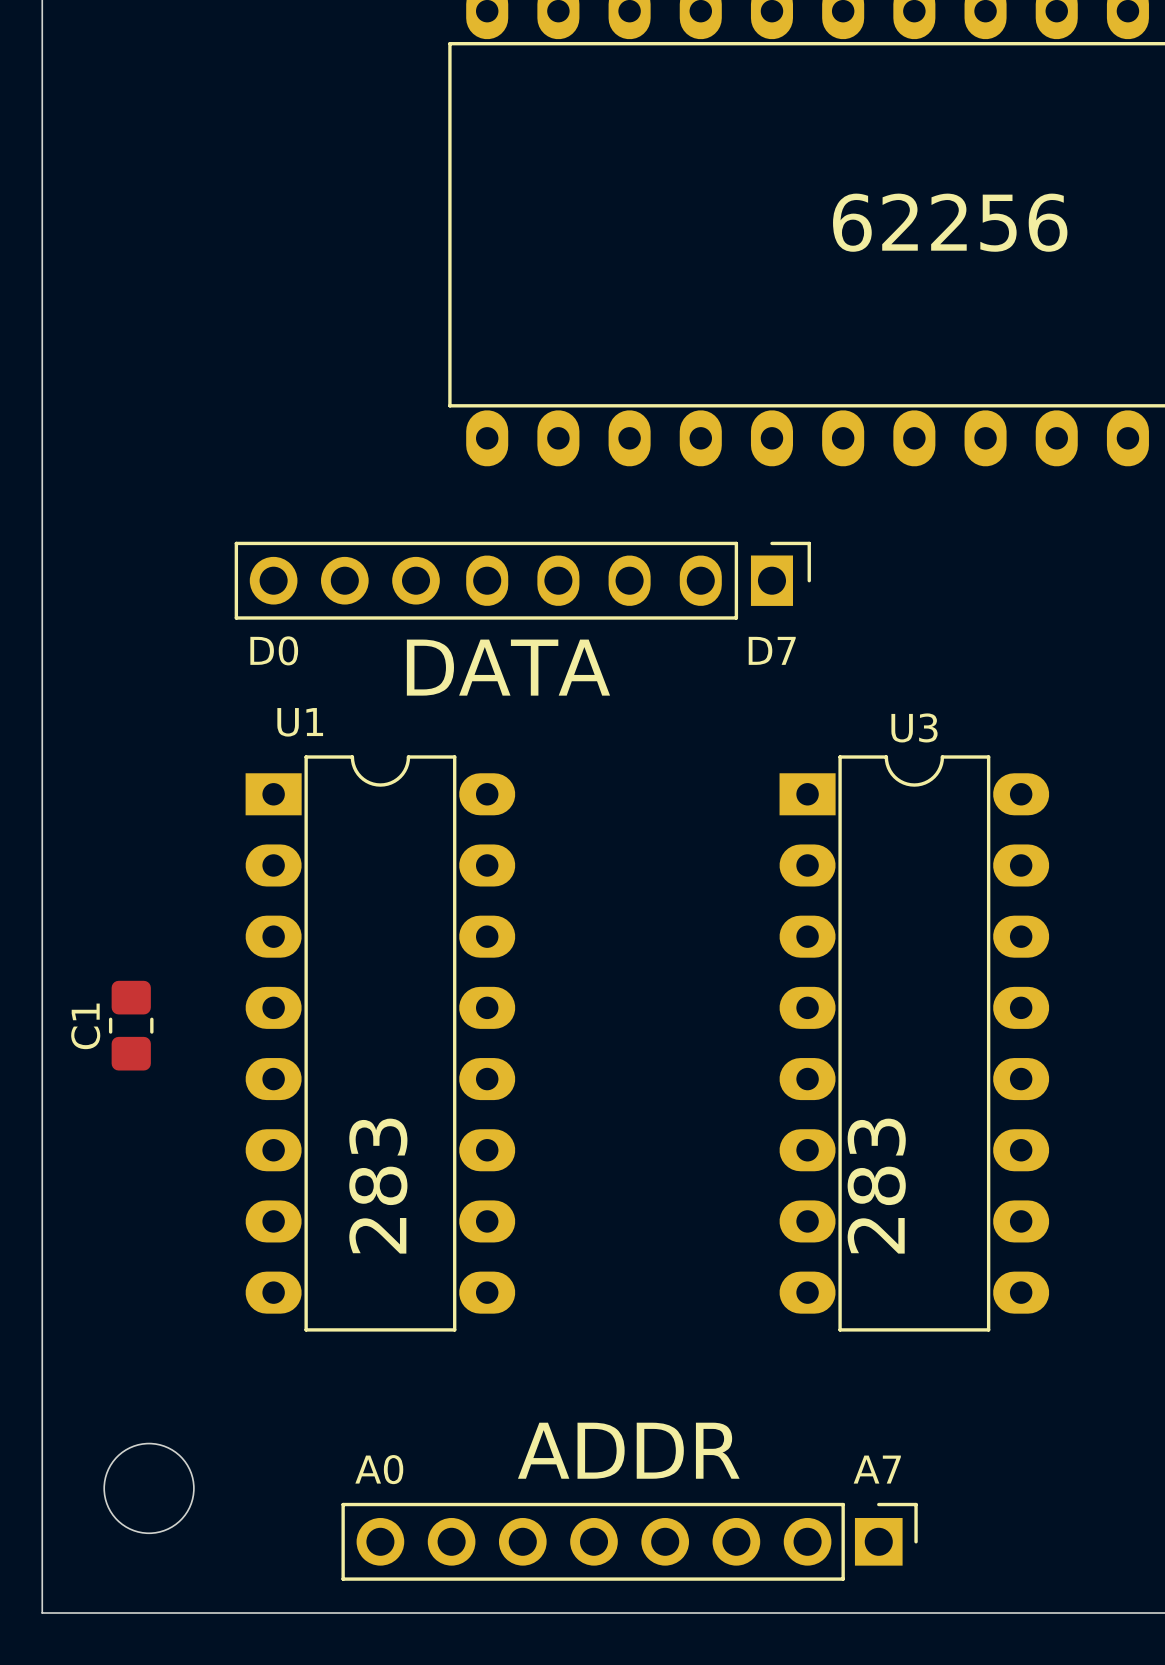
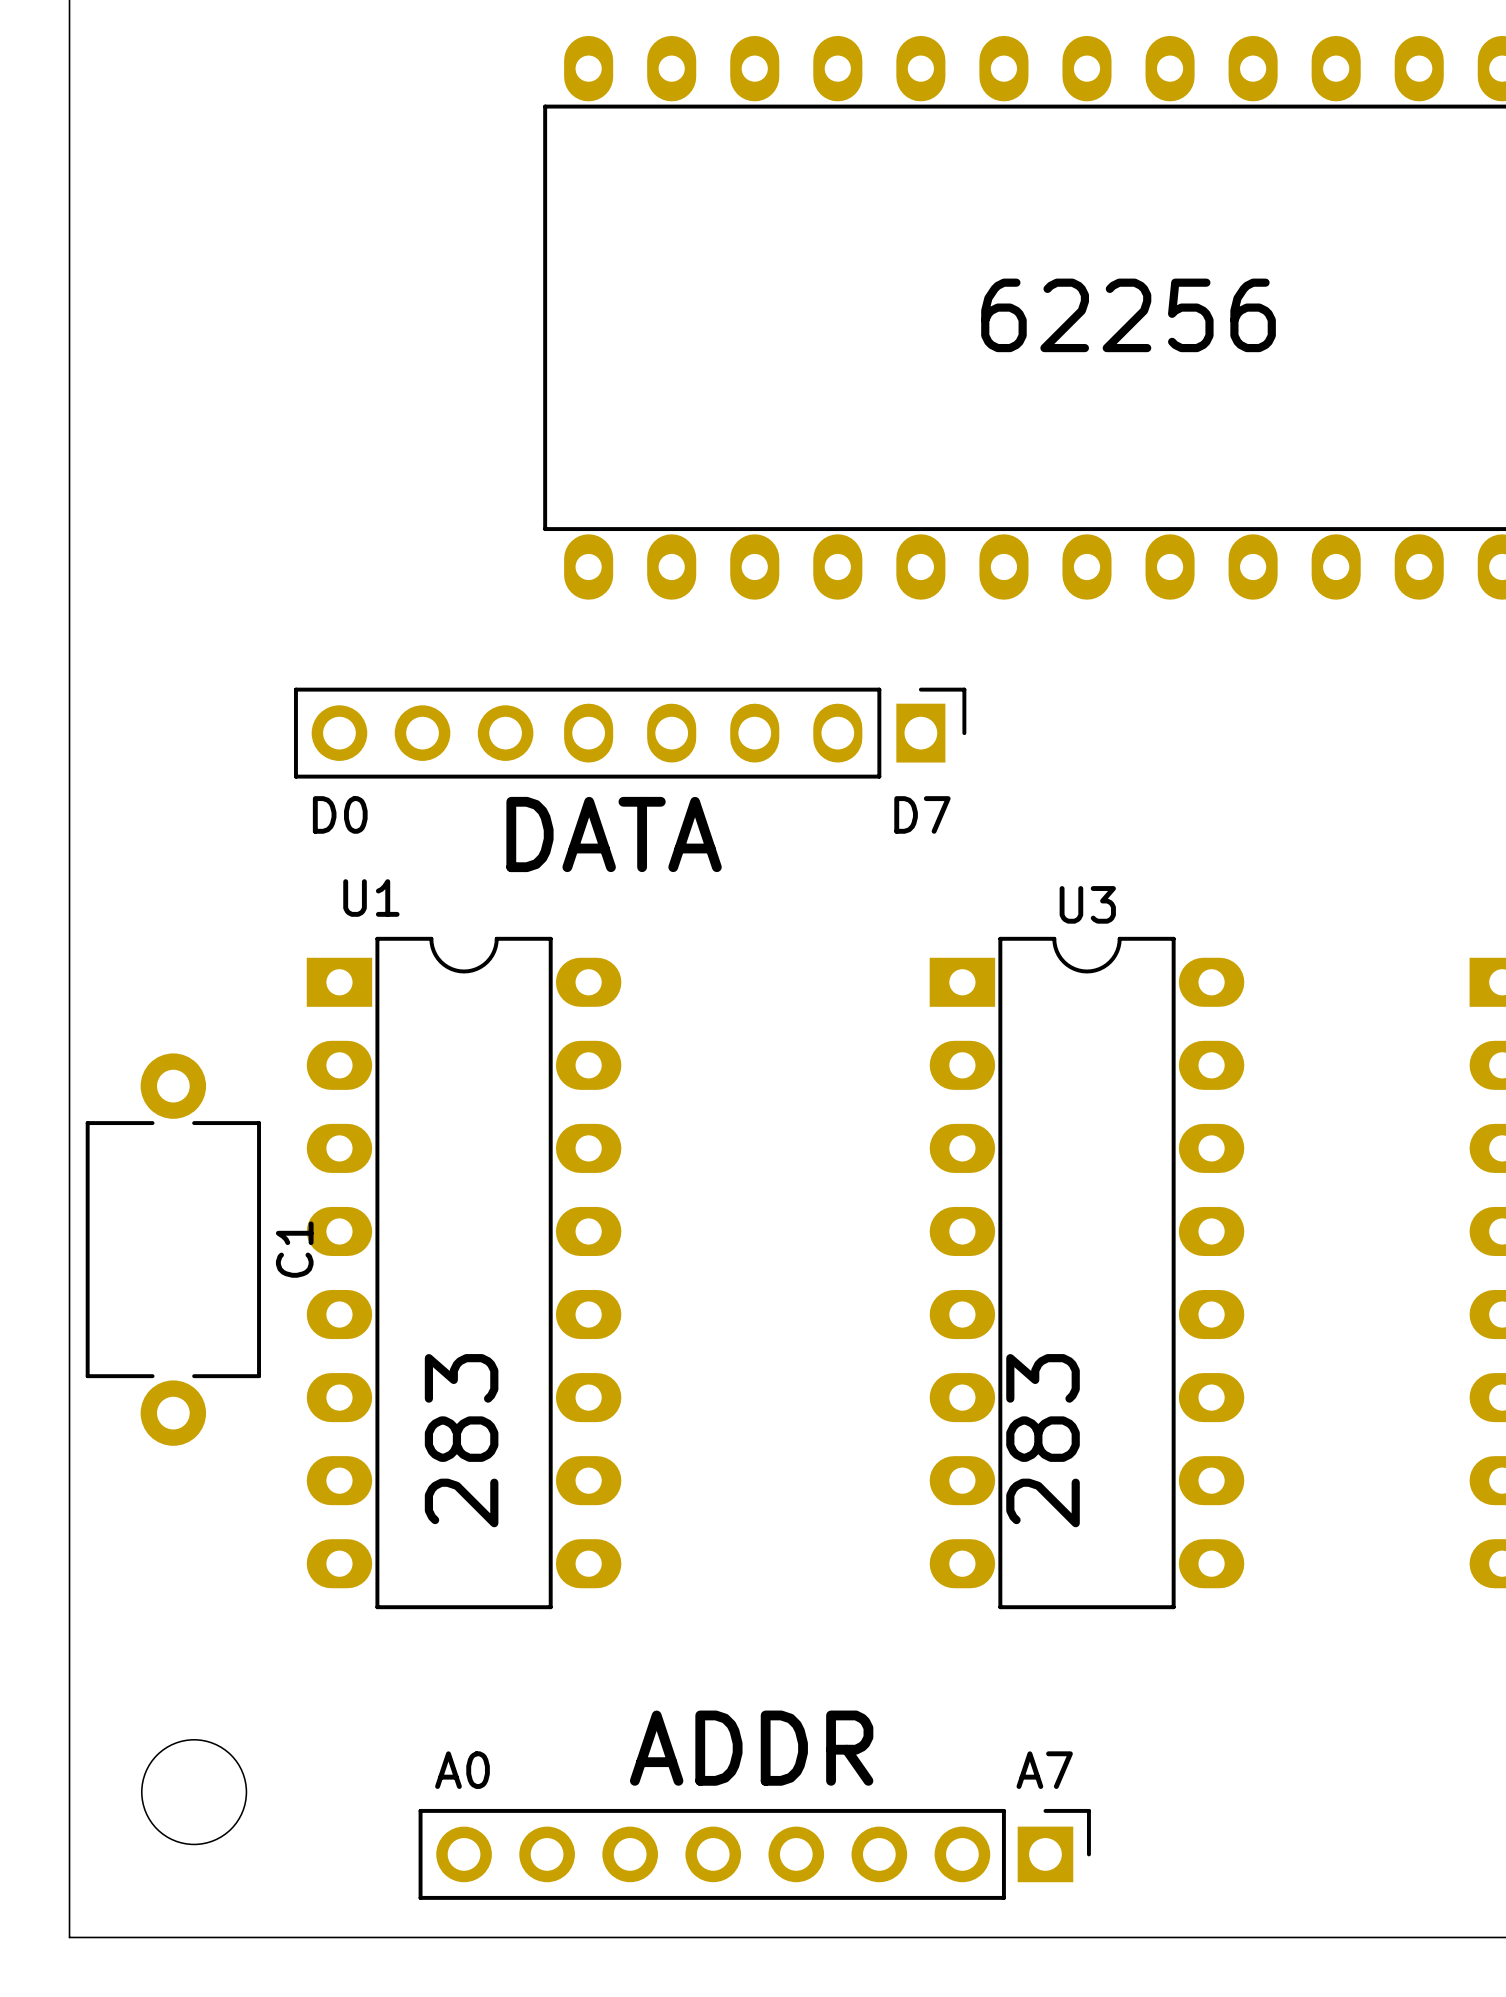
C1 footprint: [108, 980, 154, 1071] -> [85, 1053, 261, 1446]
C1 name position: C1 (85, 1026) -> C1 (294, 1249)

